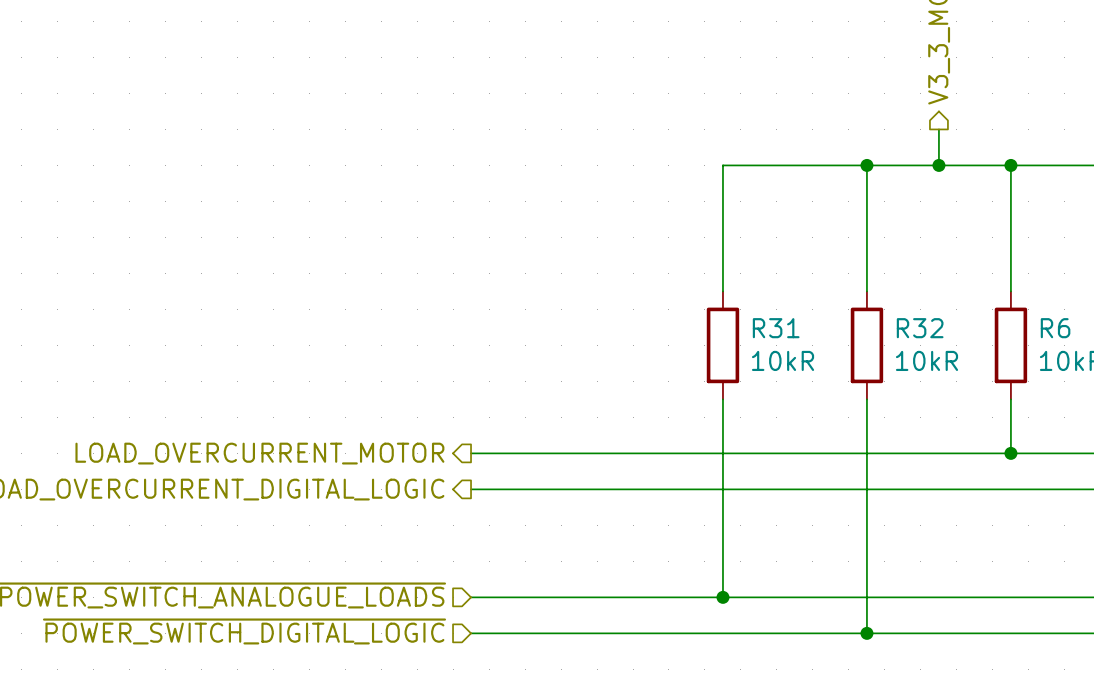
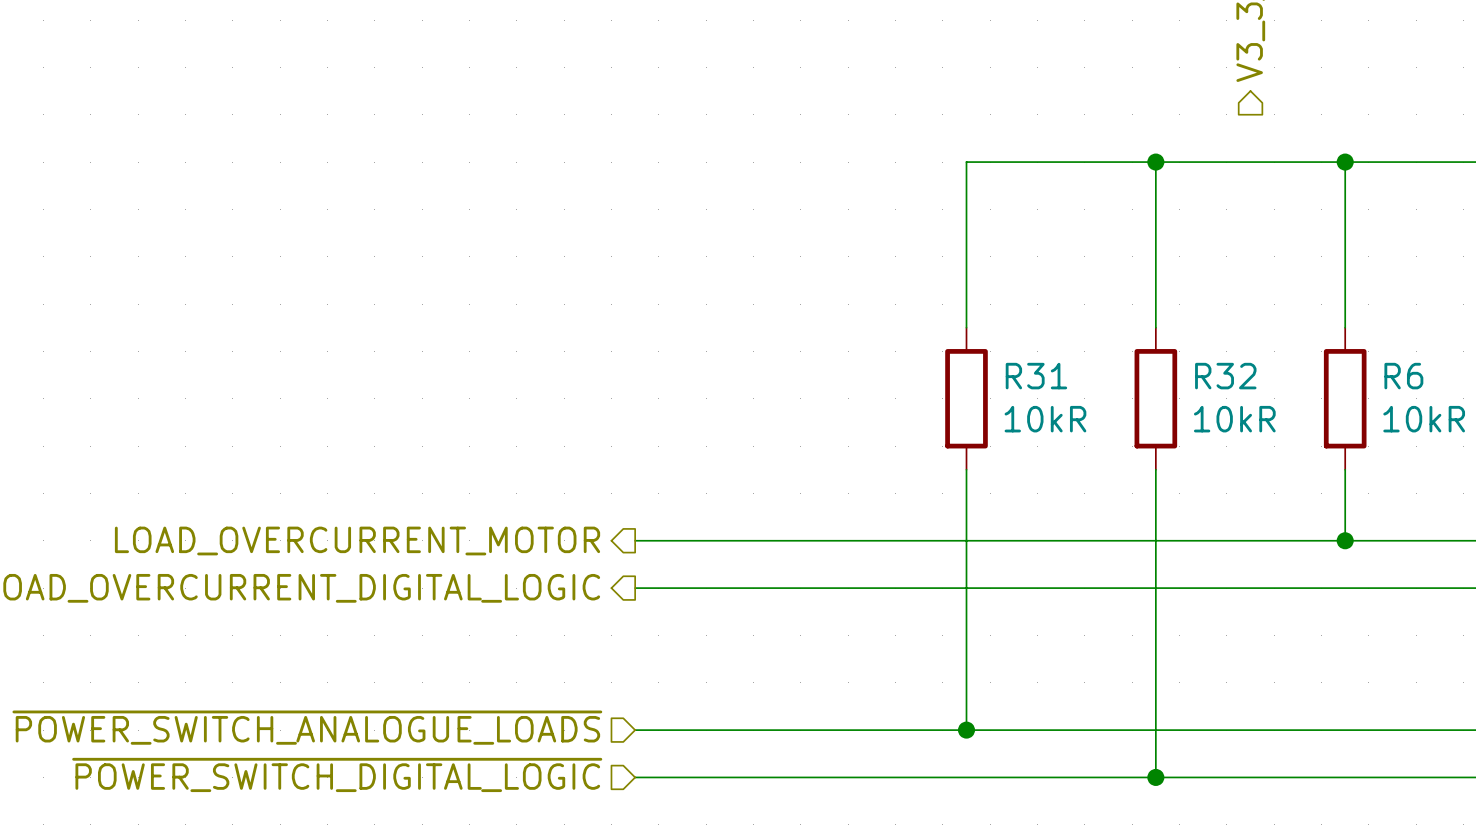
wire: (938, 129) (938, 165) -> none
junction: (938, 165) -> none

